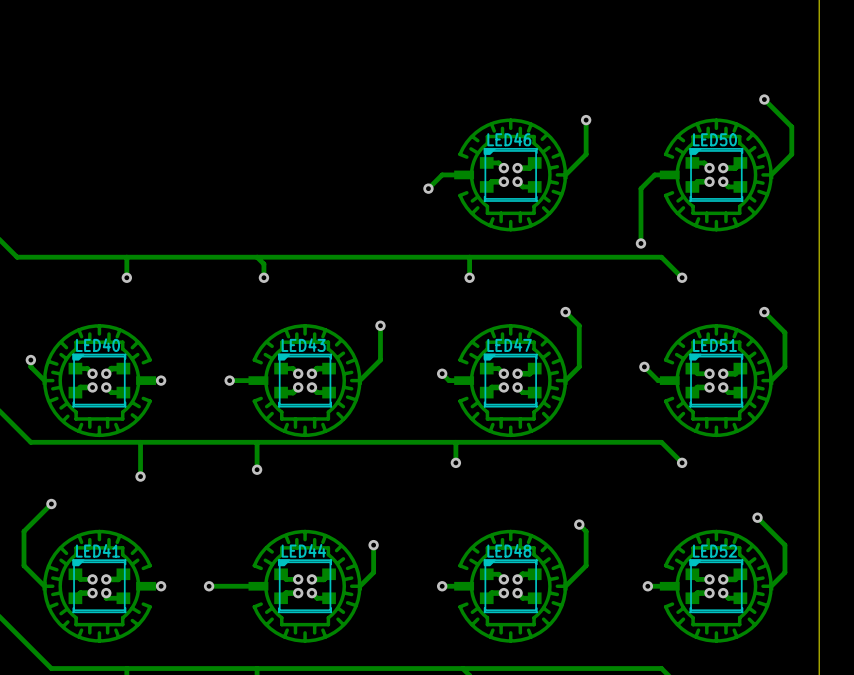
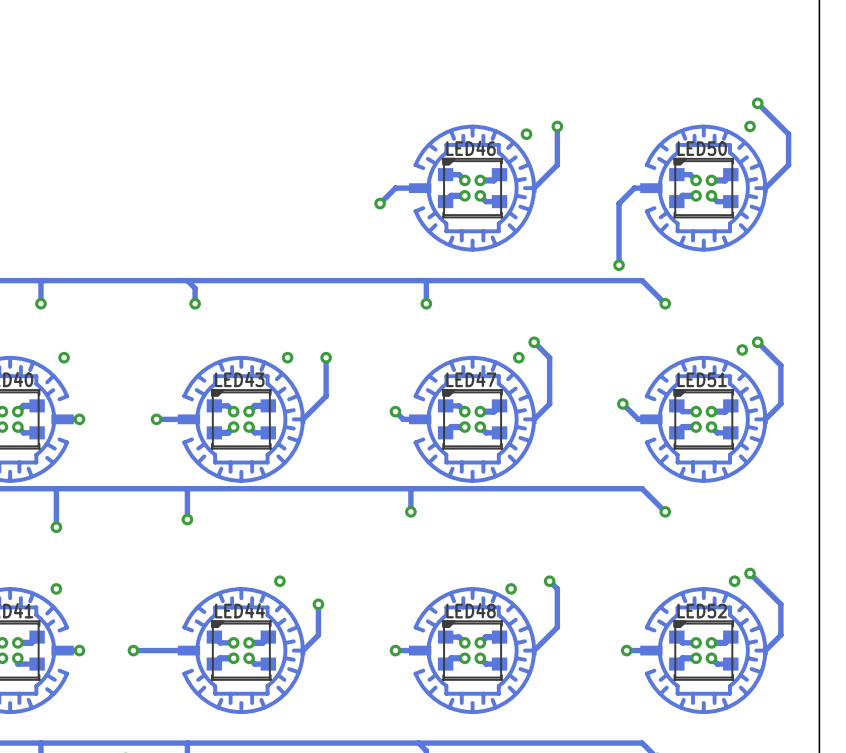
via: none -> (750, 126)
via: none -> (526, 134)
via: none -> (742, 349)
via: none -> (64, 357)
via: none -> (287, 357)
via: none -> (518, 357)
via: none -> (279, 581)
via: none -> (734, 581)
via: none -> (56, 588)
via: none -> (511, 588)

